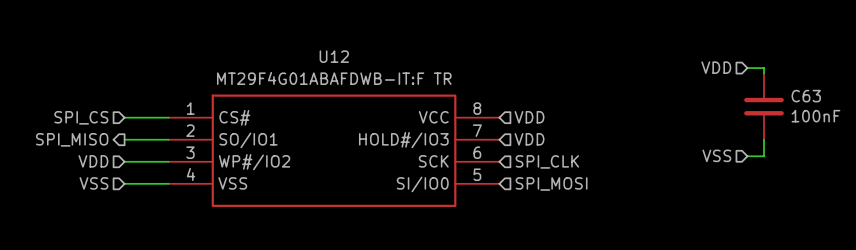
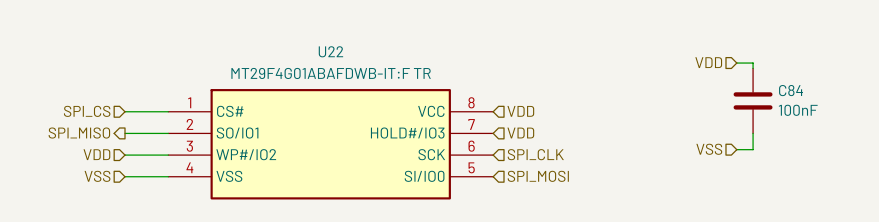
U12 name: U12 (334, 56) -> U22 (330, 51)
C63 name: C63 (806, 96) -> C84 (791, 90)

